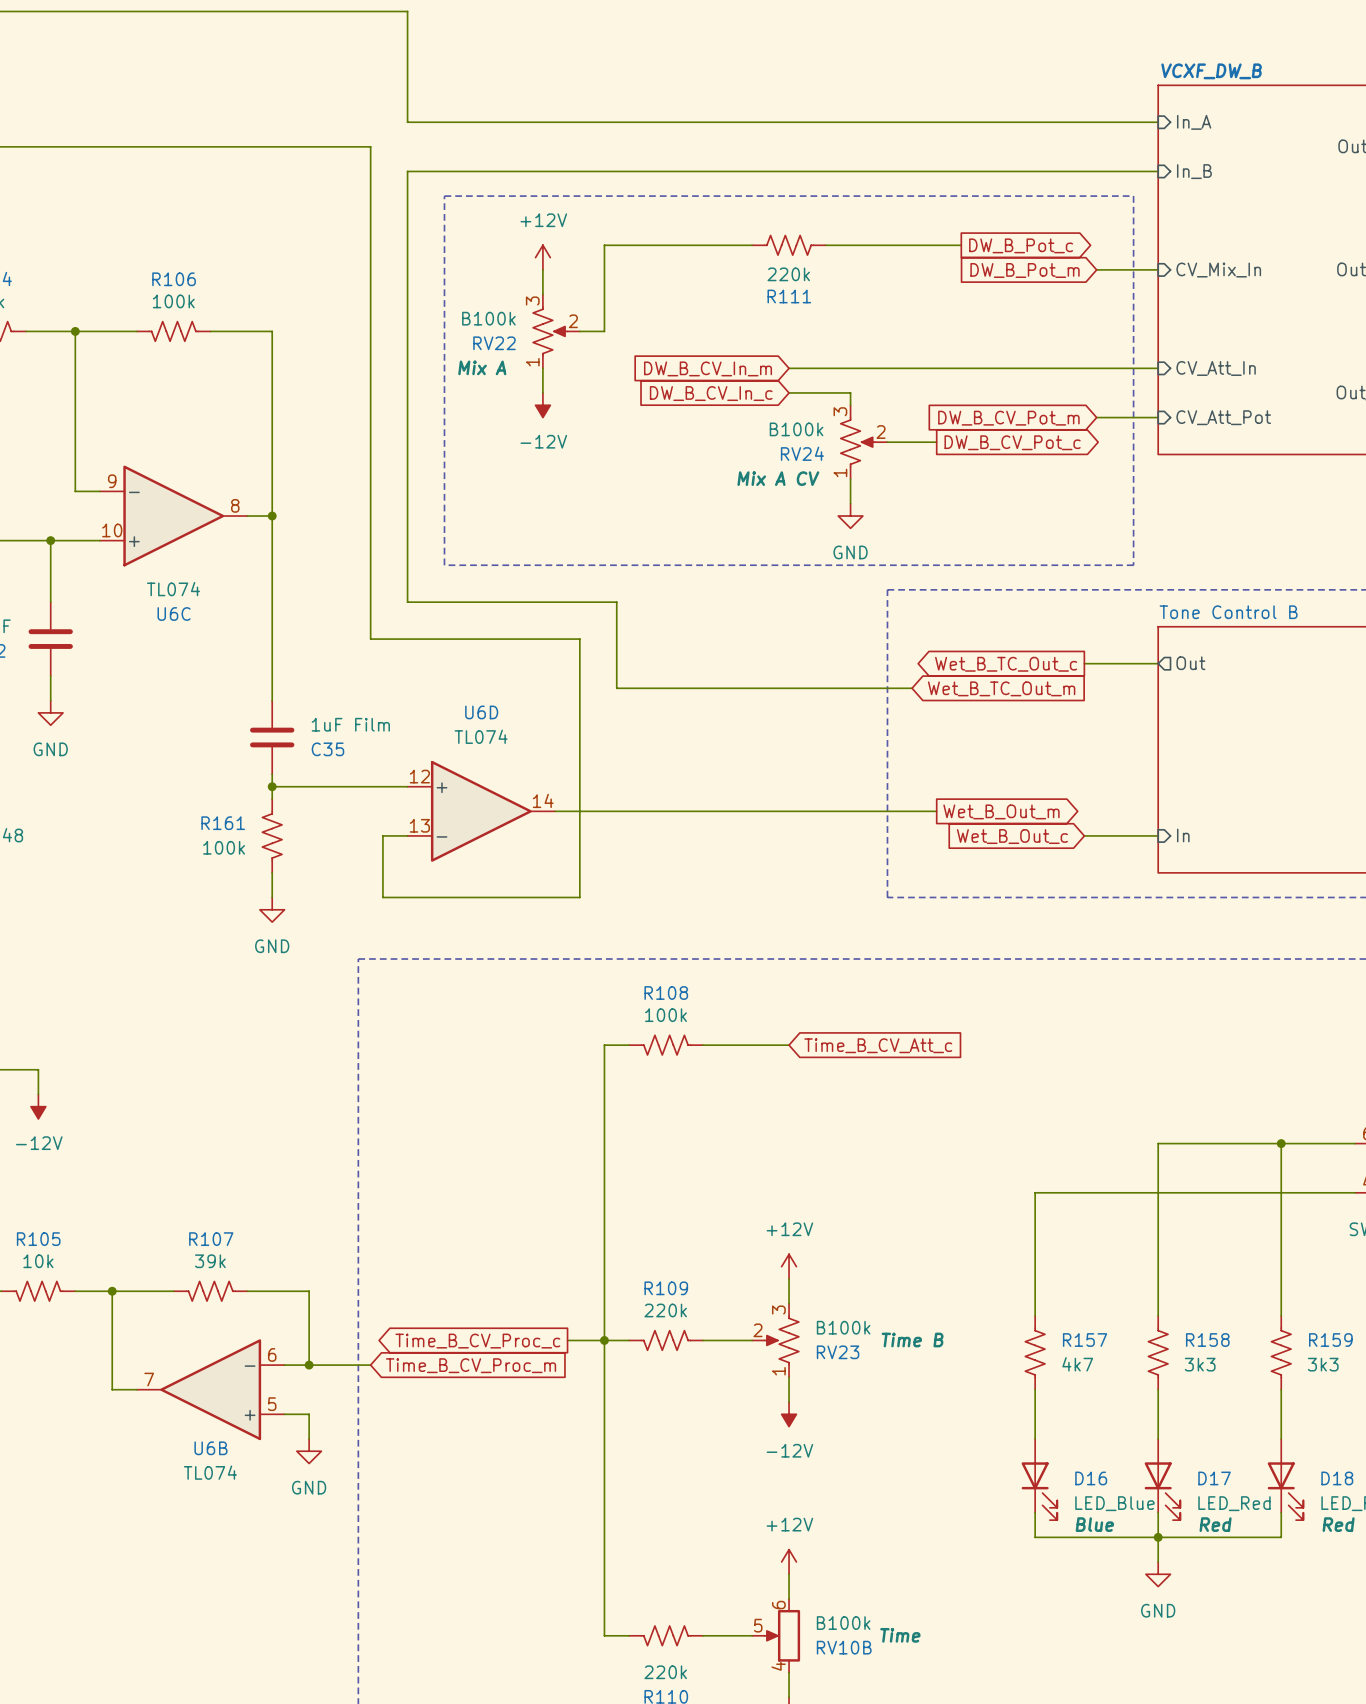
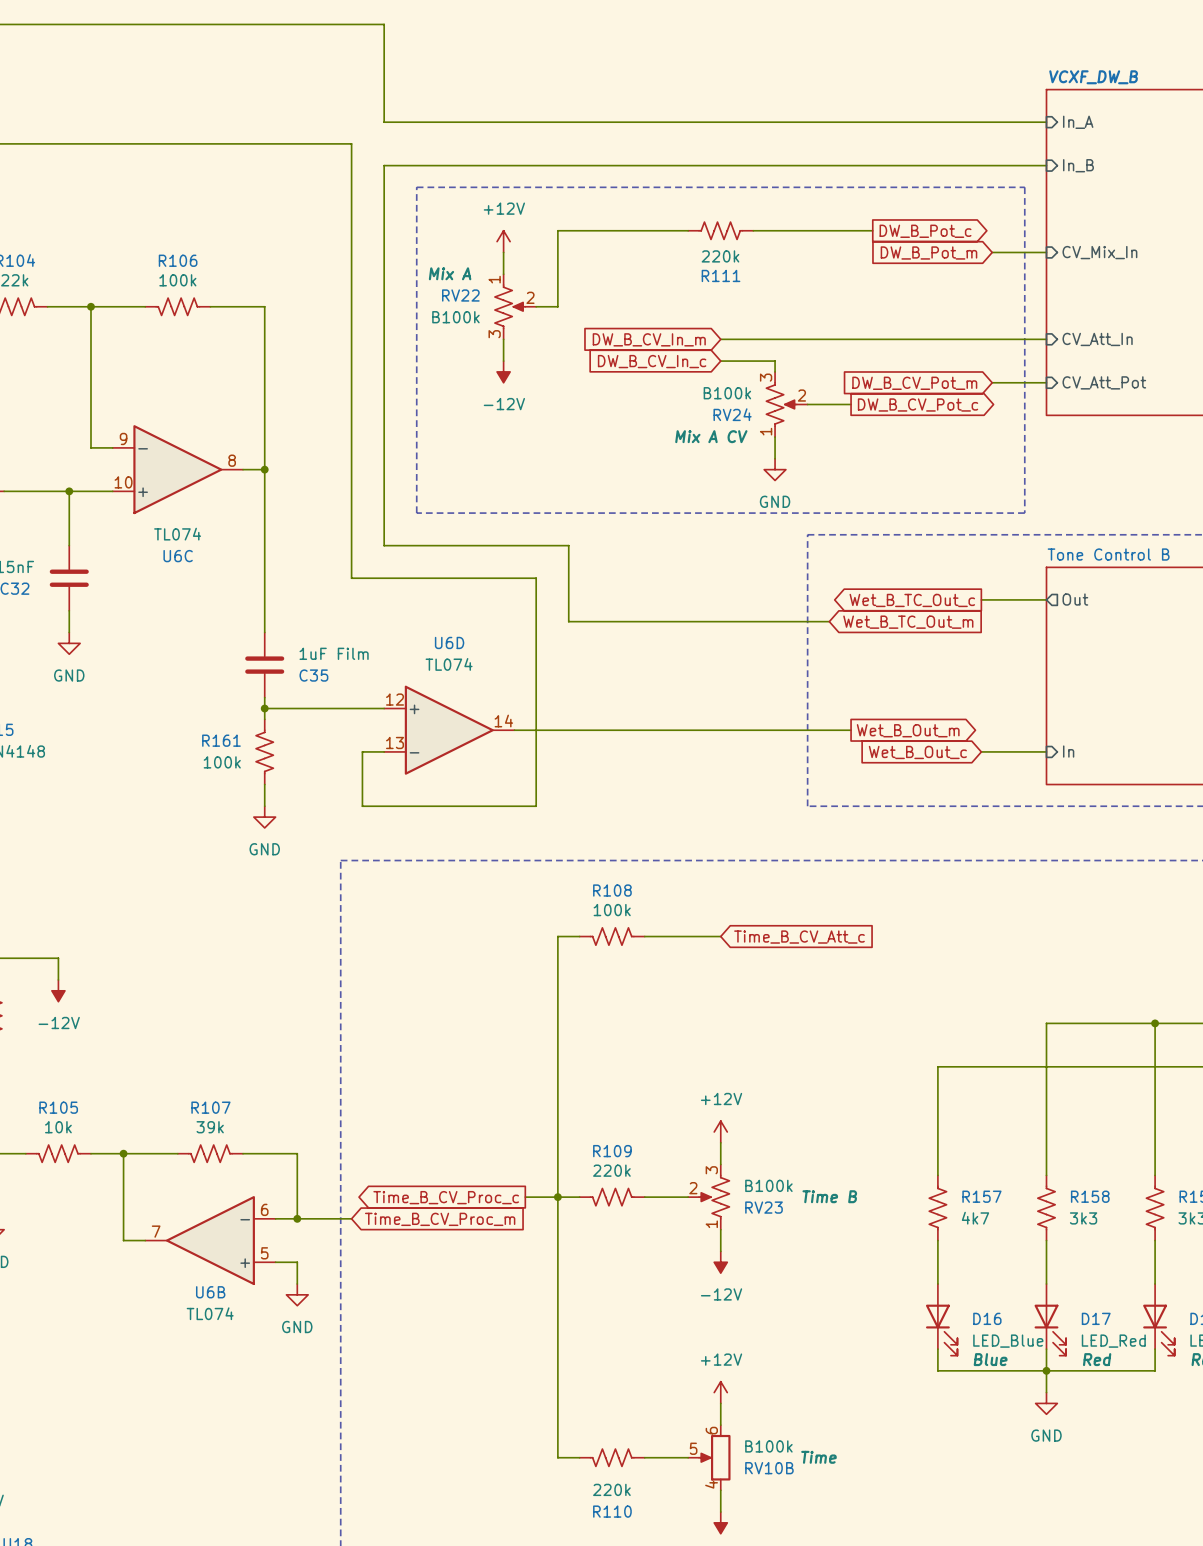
RV22 flip: as is (550, 331) -> up-down (510, 306)

